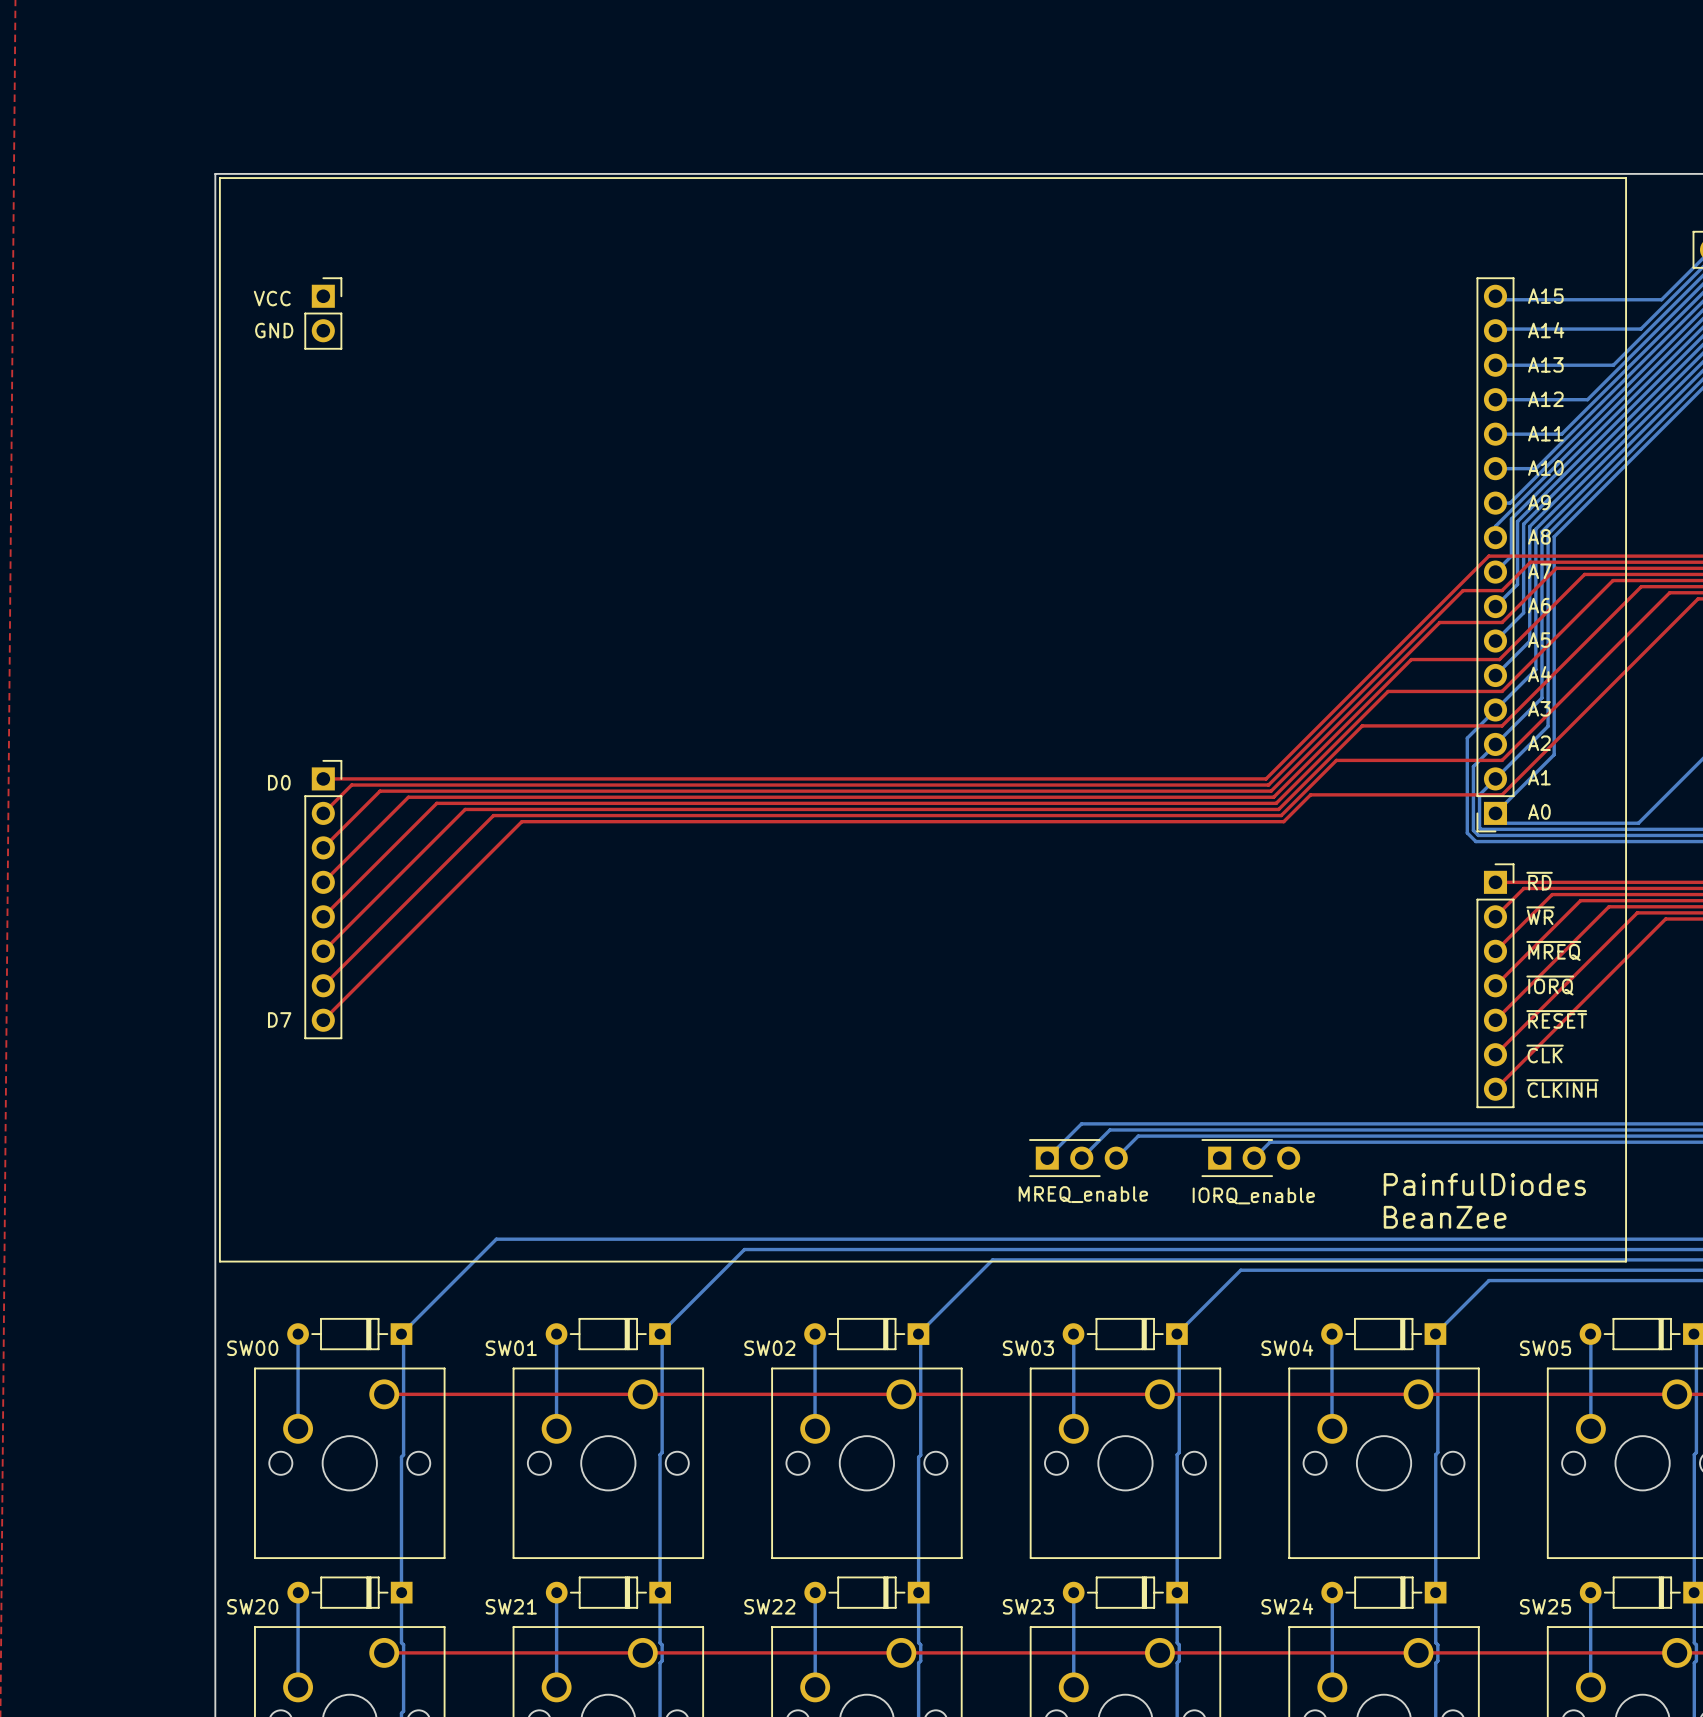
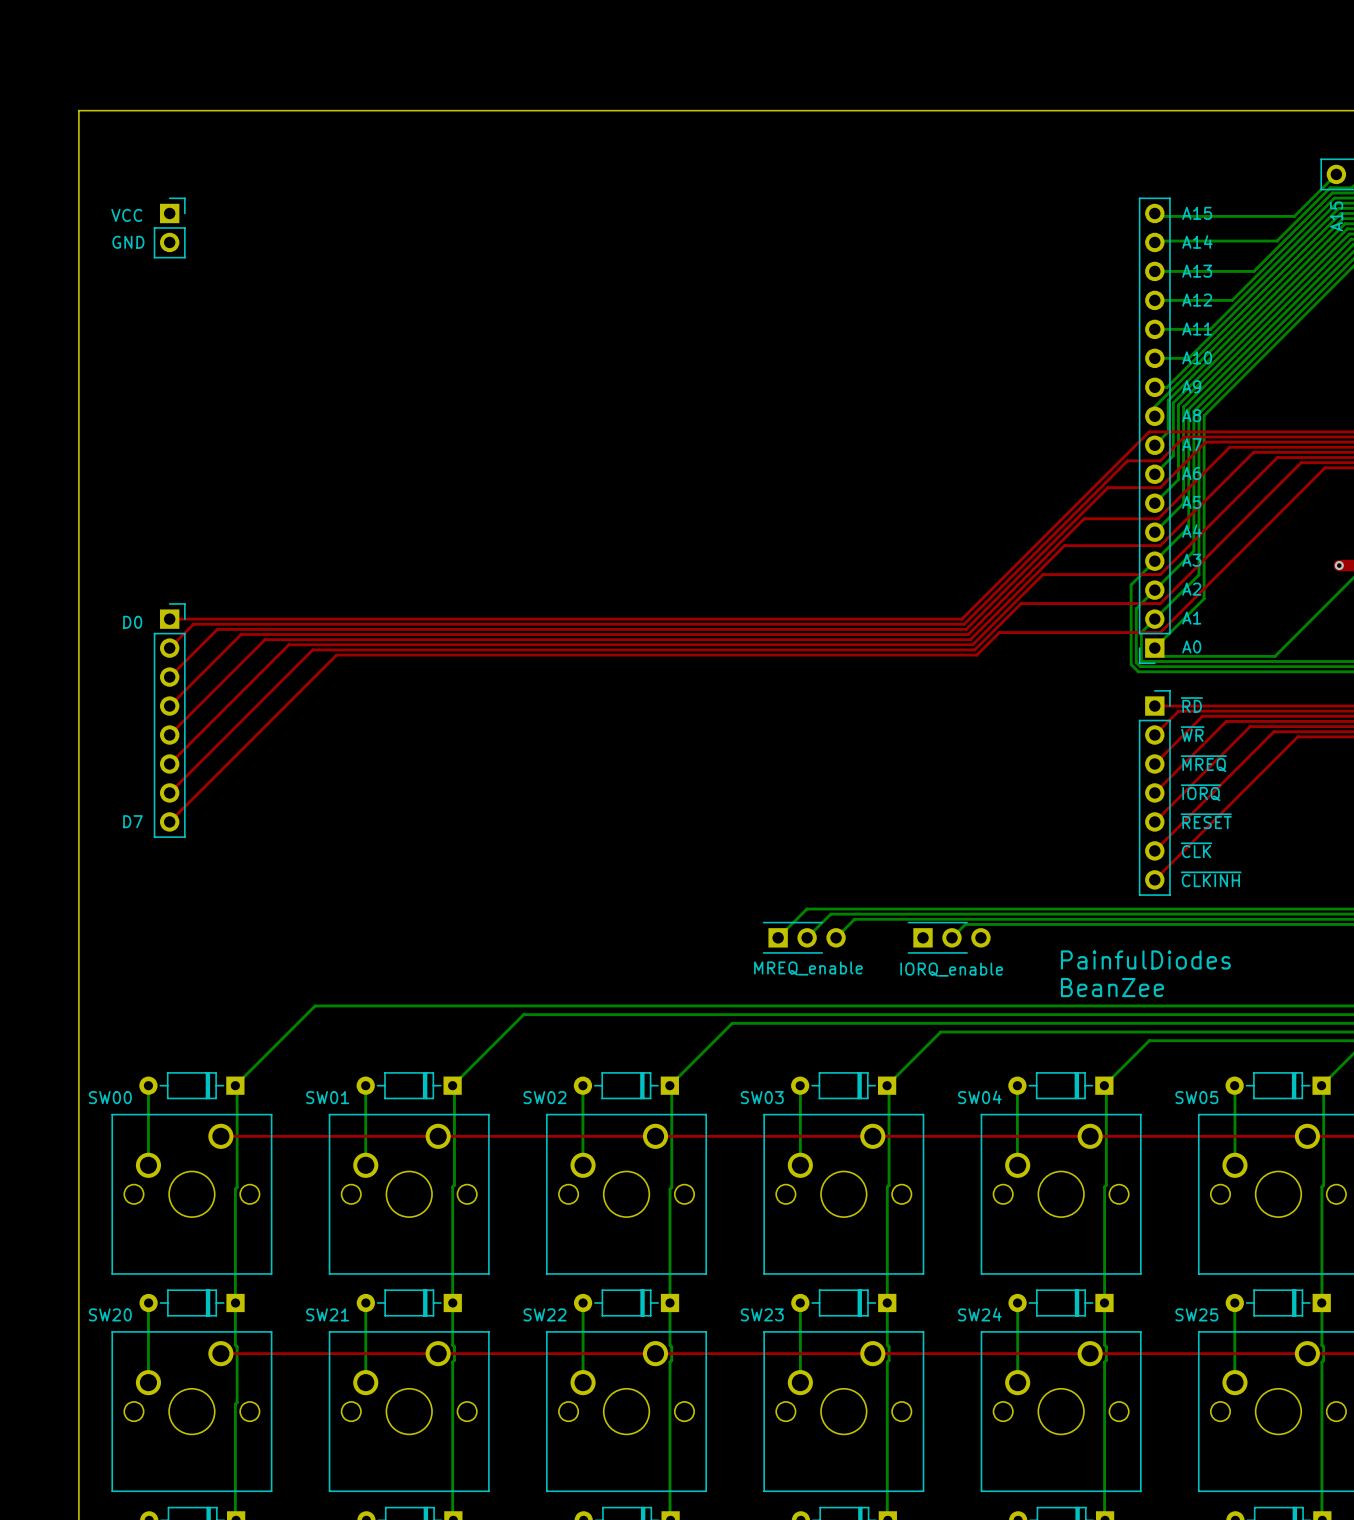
line: (219, 178) (1626, 178) (1626, 1261) (219, 1261) (219, 178) -> none

